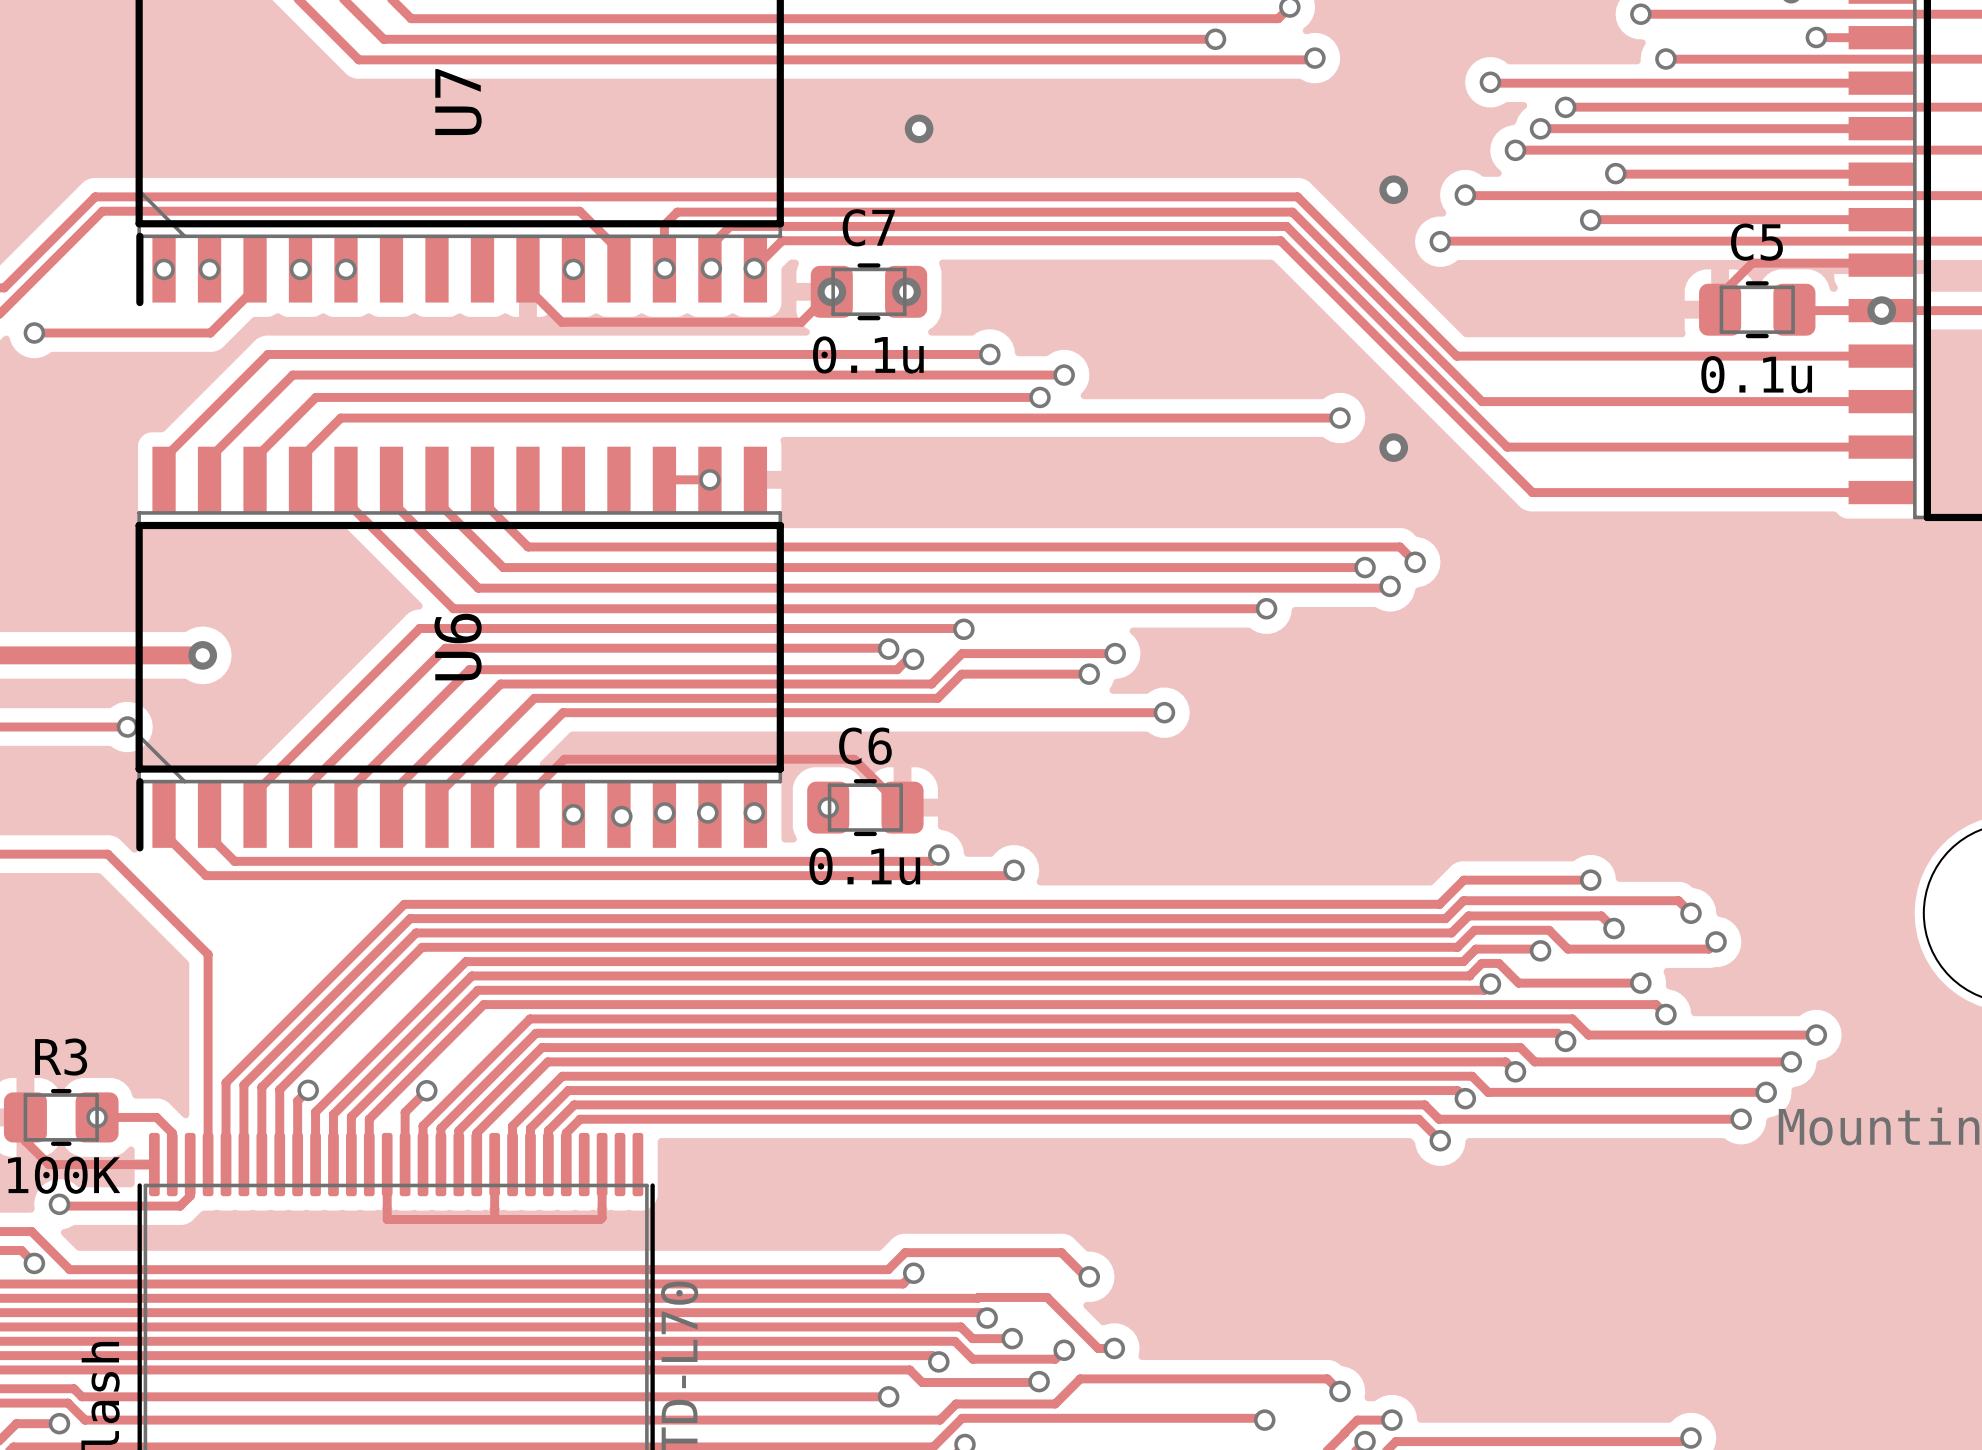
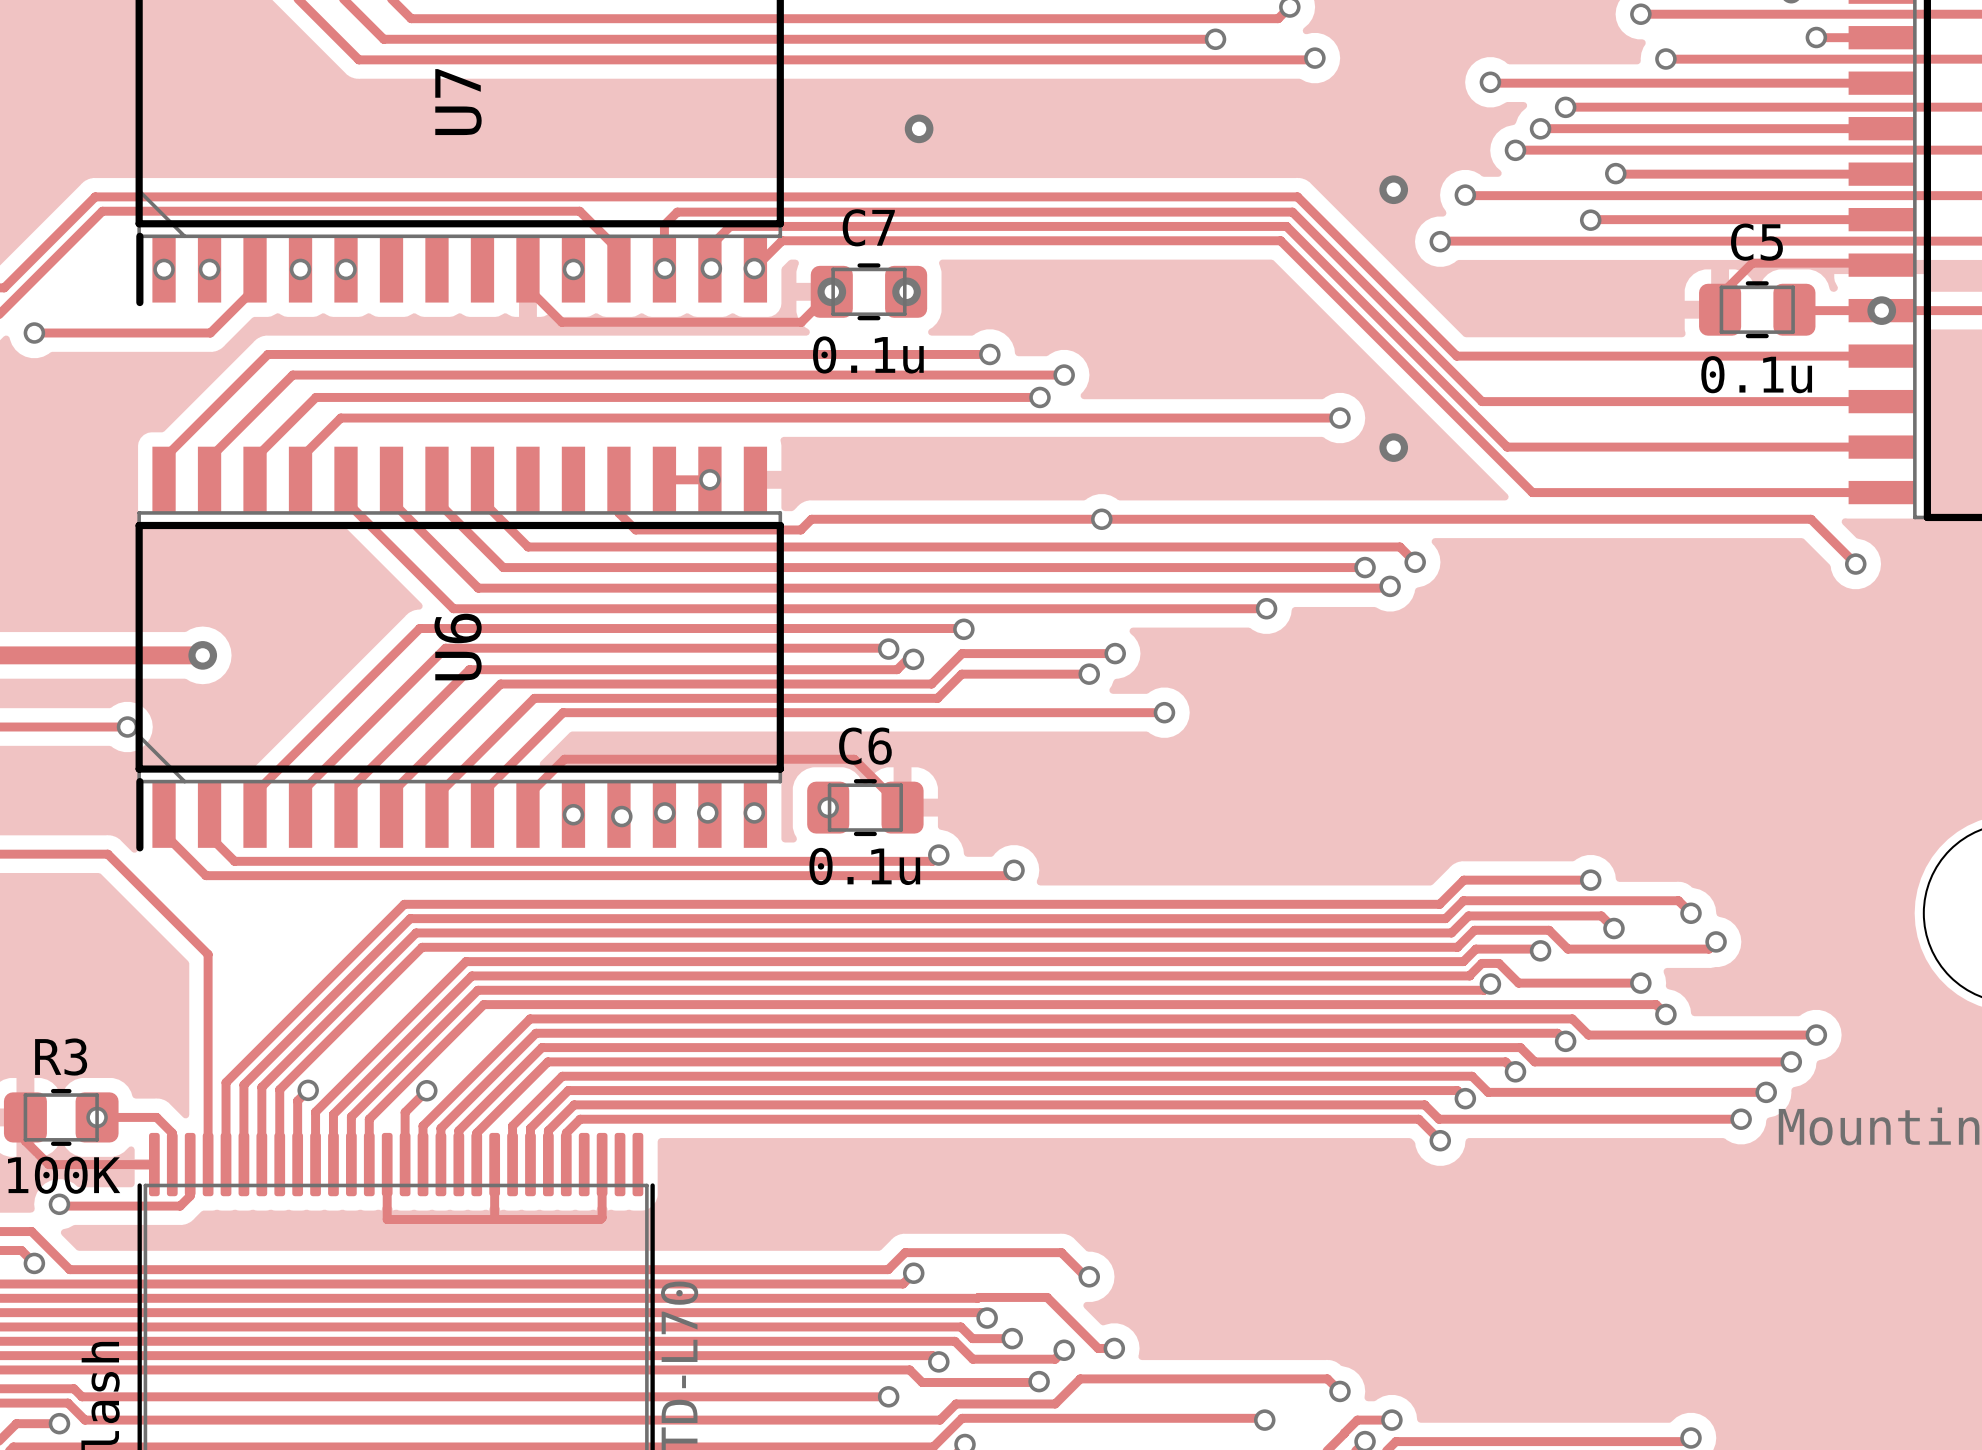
track: none -> (618, 479) (618, 513) (635, 529) (800, 529) (811, 519) (1810, 519) (1855, 564)
via: none -> (1101, 519)
via: none -> (1855, 564)

